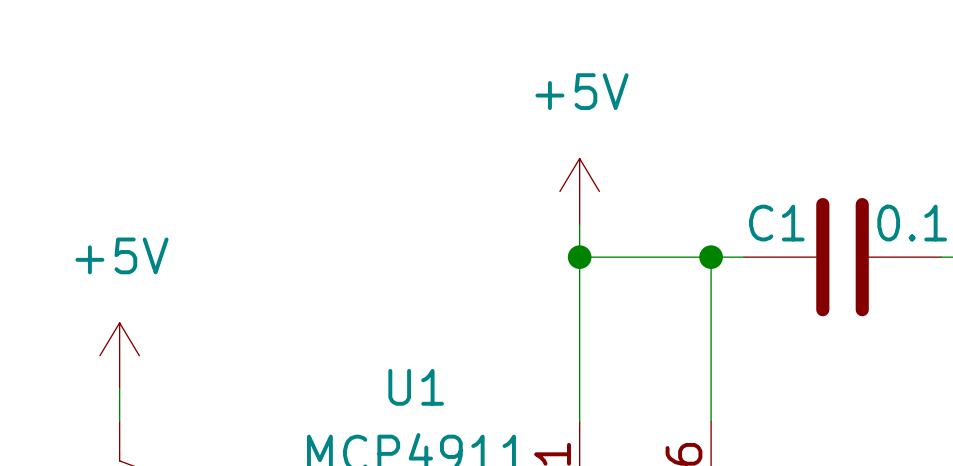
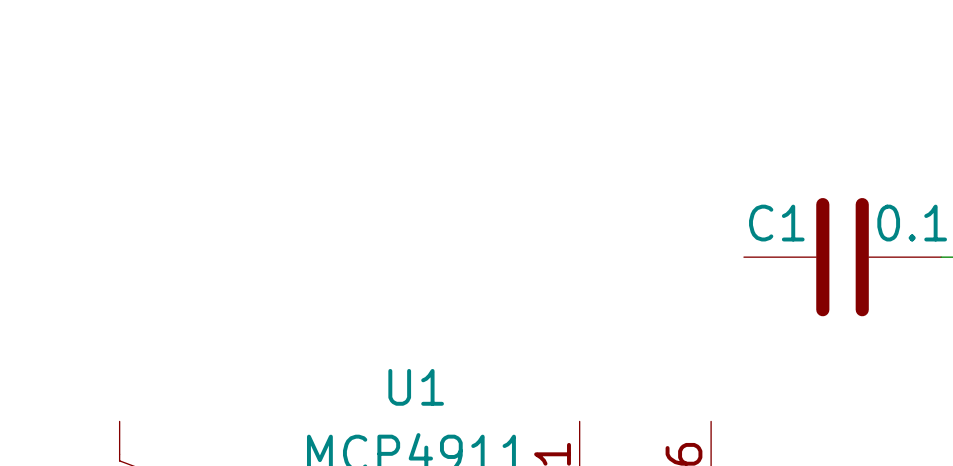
power symbol: +5V (579, 191) -> none
wire: (579, 224) (579, 421) -> none
wire: (579, 257) (743, 257) -> none
junction: (579, 257) -> none
wire: (711, 257) (711, 421) -> none
junction: (711, 257) -> none
power symbol: +5V (119, 355) -> none
wire: (119, 388) (119, 421) -> none

